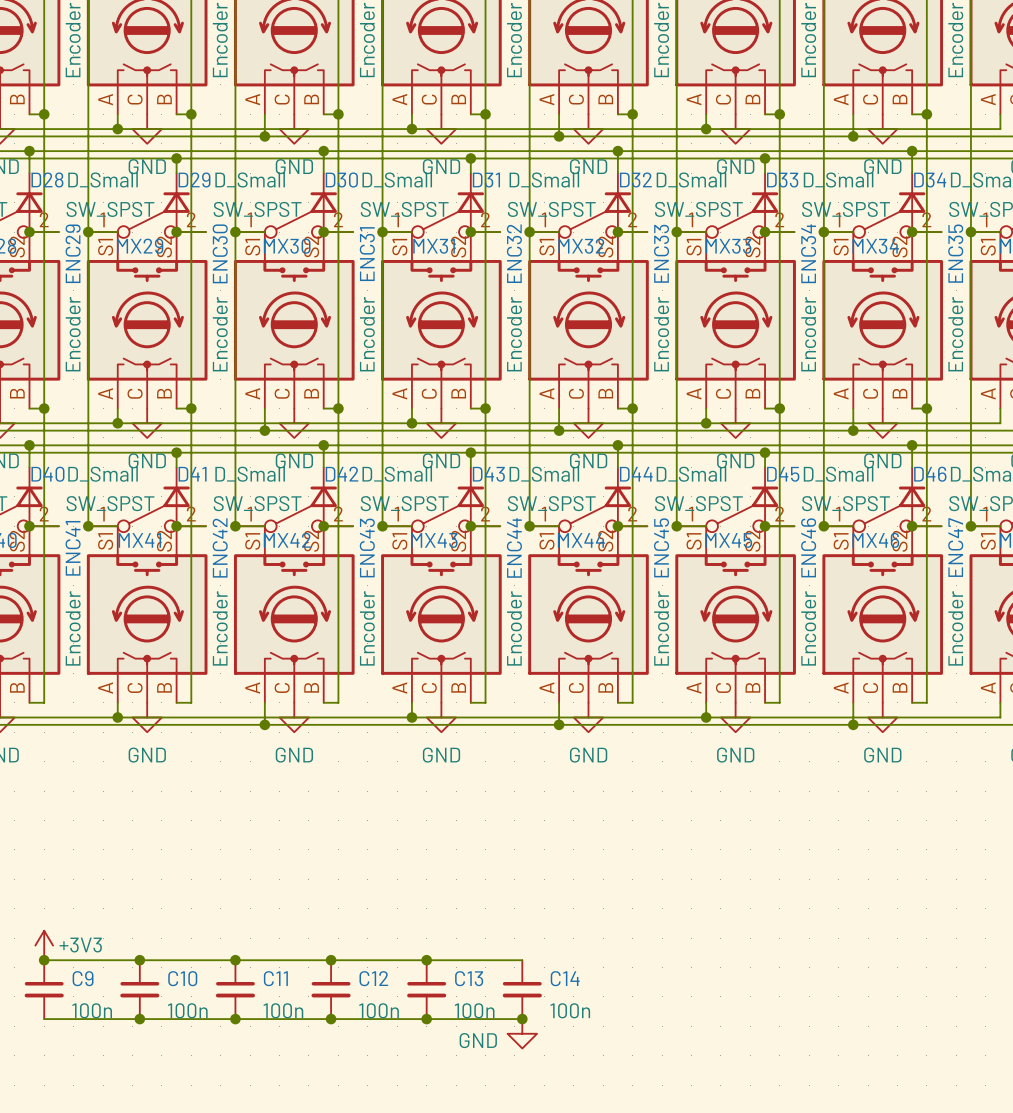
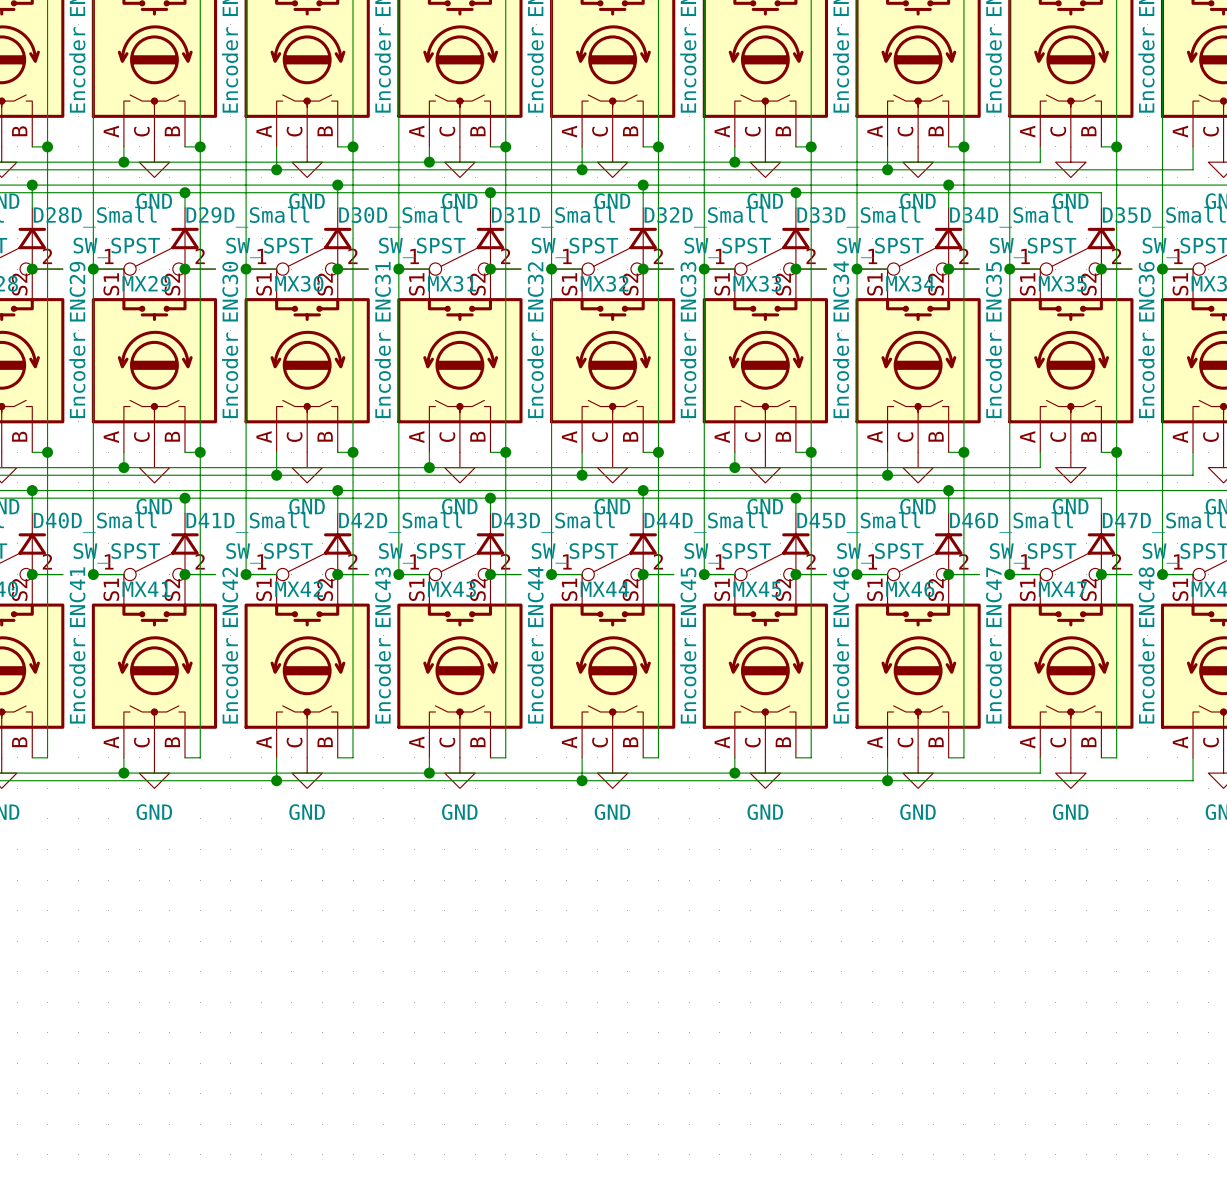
power symbol: +3V3 (44, 945) -> none
wire: (44, 960) (522, 960) -> none
junction: (44, 960) -> none
junction: (139, 960) -> none
junction: (235, 960) -> none
junction: (331, 960) -> none
junction: (426, 960) -> none
C9: 100n (44, 989) -> none
C10: 100n (139, 989) -> none
C11: 100n (235, 989) -> none
C12: 100n (331, 989) -> none
C13: 100n (426, 989) -> none
C14: 100n (522, 989) -> none
wire: (44, 1019) (522, 1019) -> none
junction: (139, 1019) -> none
junction: (235, 1019) -> none
junction: (331, 1019) -> none
junction: (426, 1019) -> none
junction: (522, 1019) -> none
power symbol: GND (522, 1033) -> none

